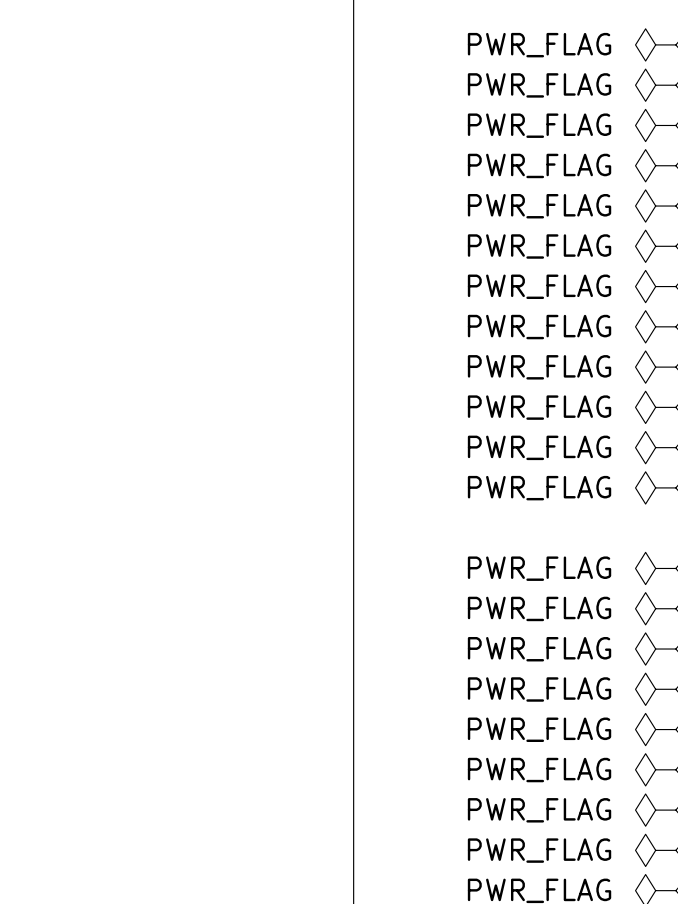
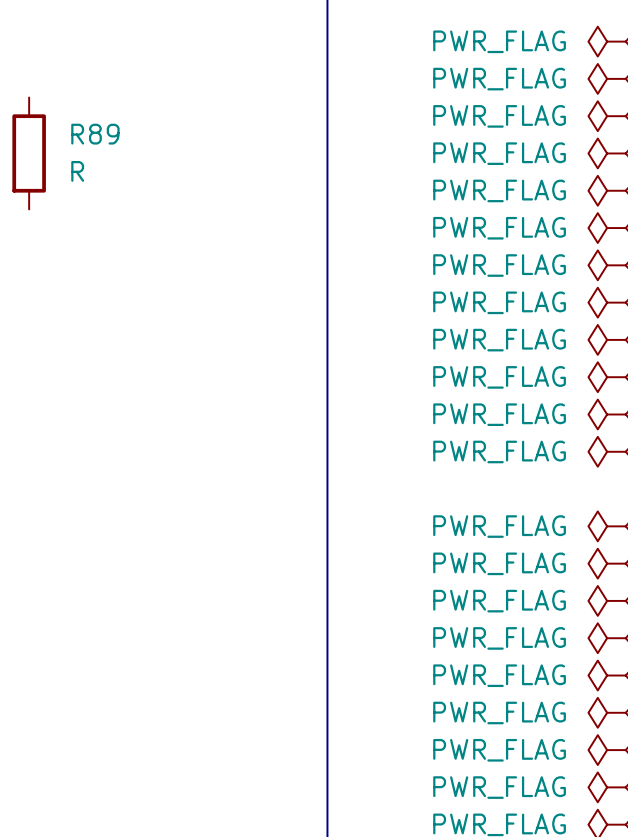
R89: none -> R (29, 153)

